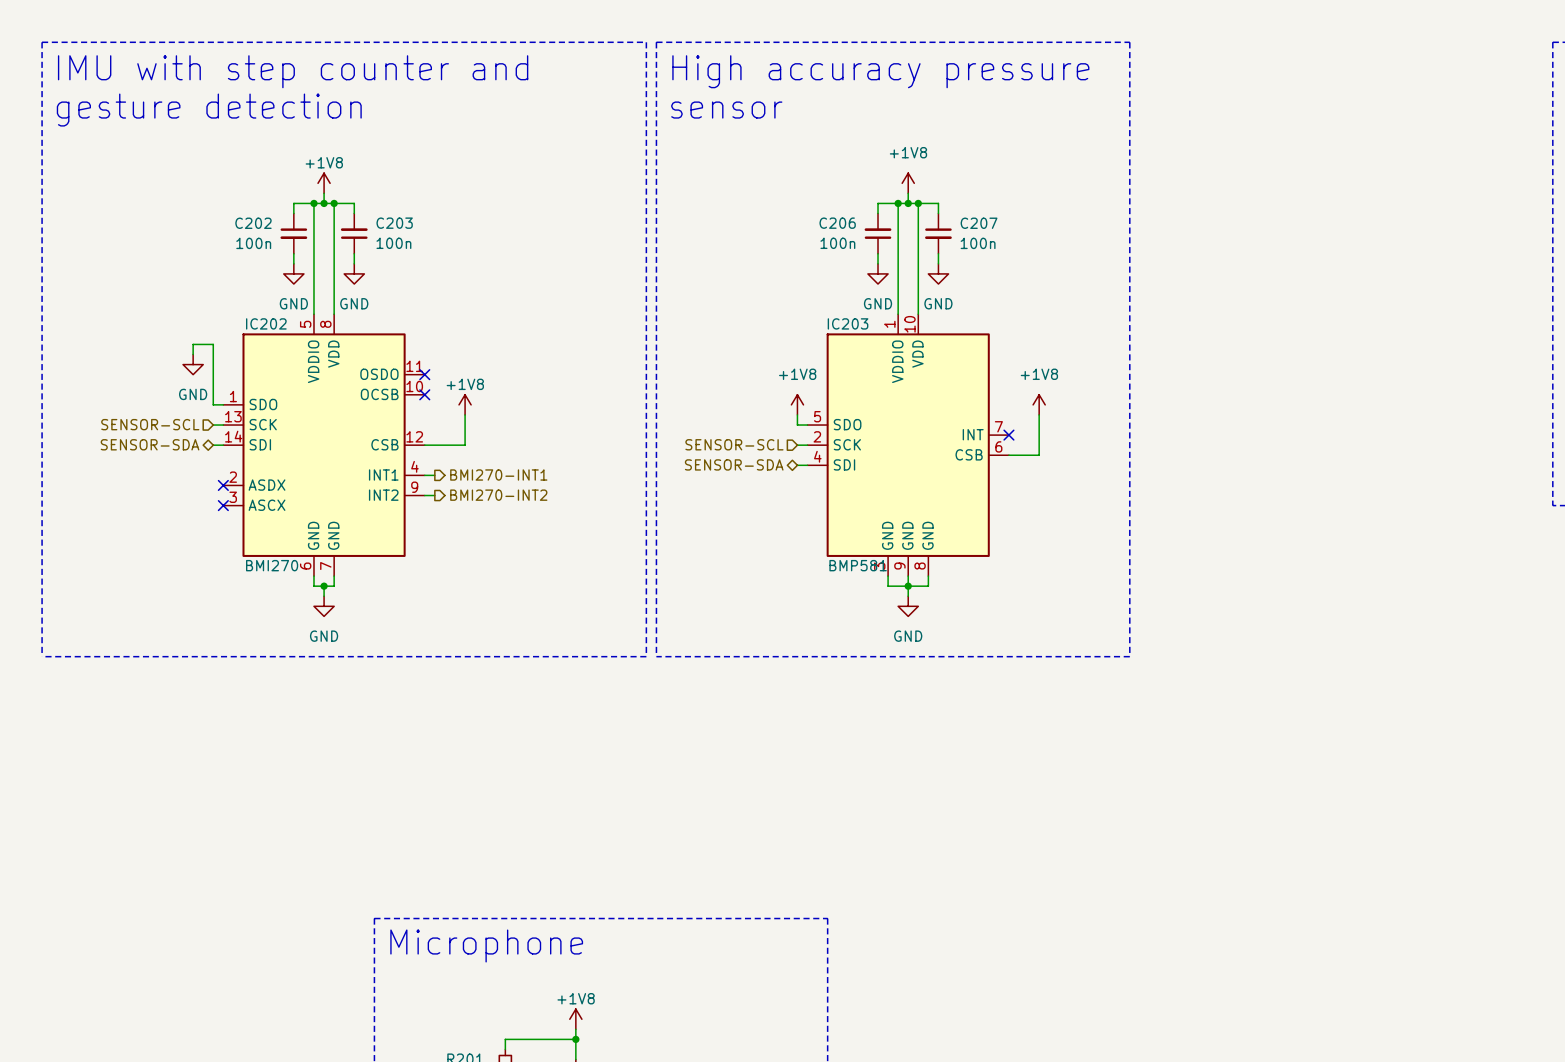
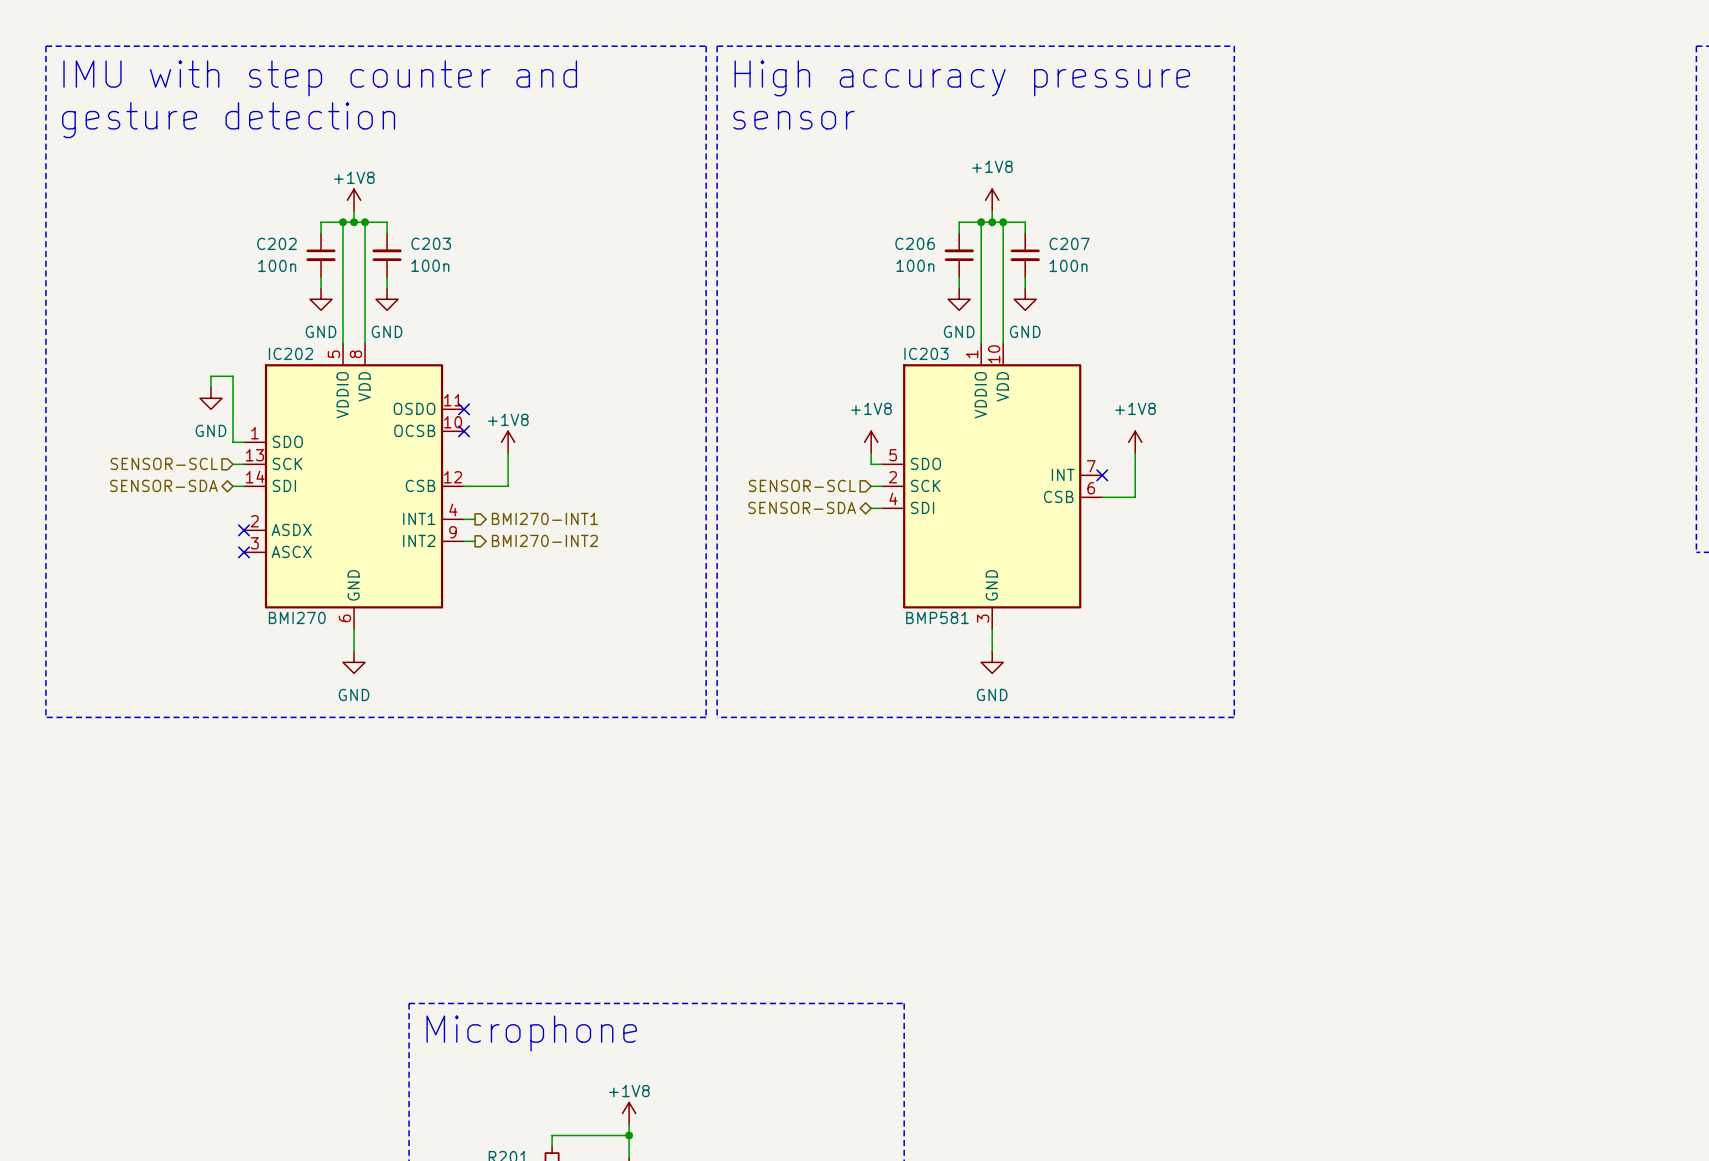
IC202 symbol: [223, 314, 425, 577] -> [244, 343, 465, 630]
IC203 symbol: [807, 314, 1009, 577] -> [882, 343, 1103, 630]
wire: (313, 576) (313, 586) (334, 586) (334, 576) -> none
wire: none -> (354, 629) (354, 640)
wire: (888, 576) (888, 586) (928, 586) (928, 576) -> none
junction: (324, 586) -> none
junction: (908, 586) -> none

